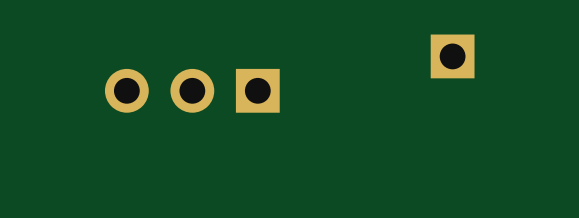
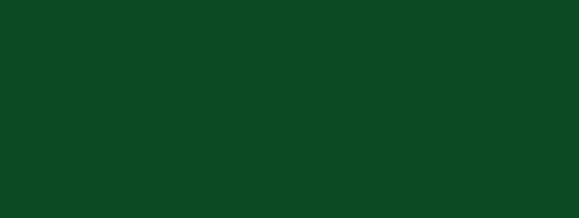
part: (452, 56) -> none
part: (192, 90) -> none

